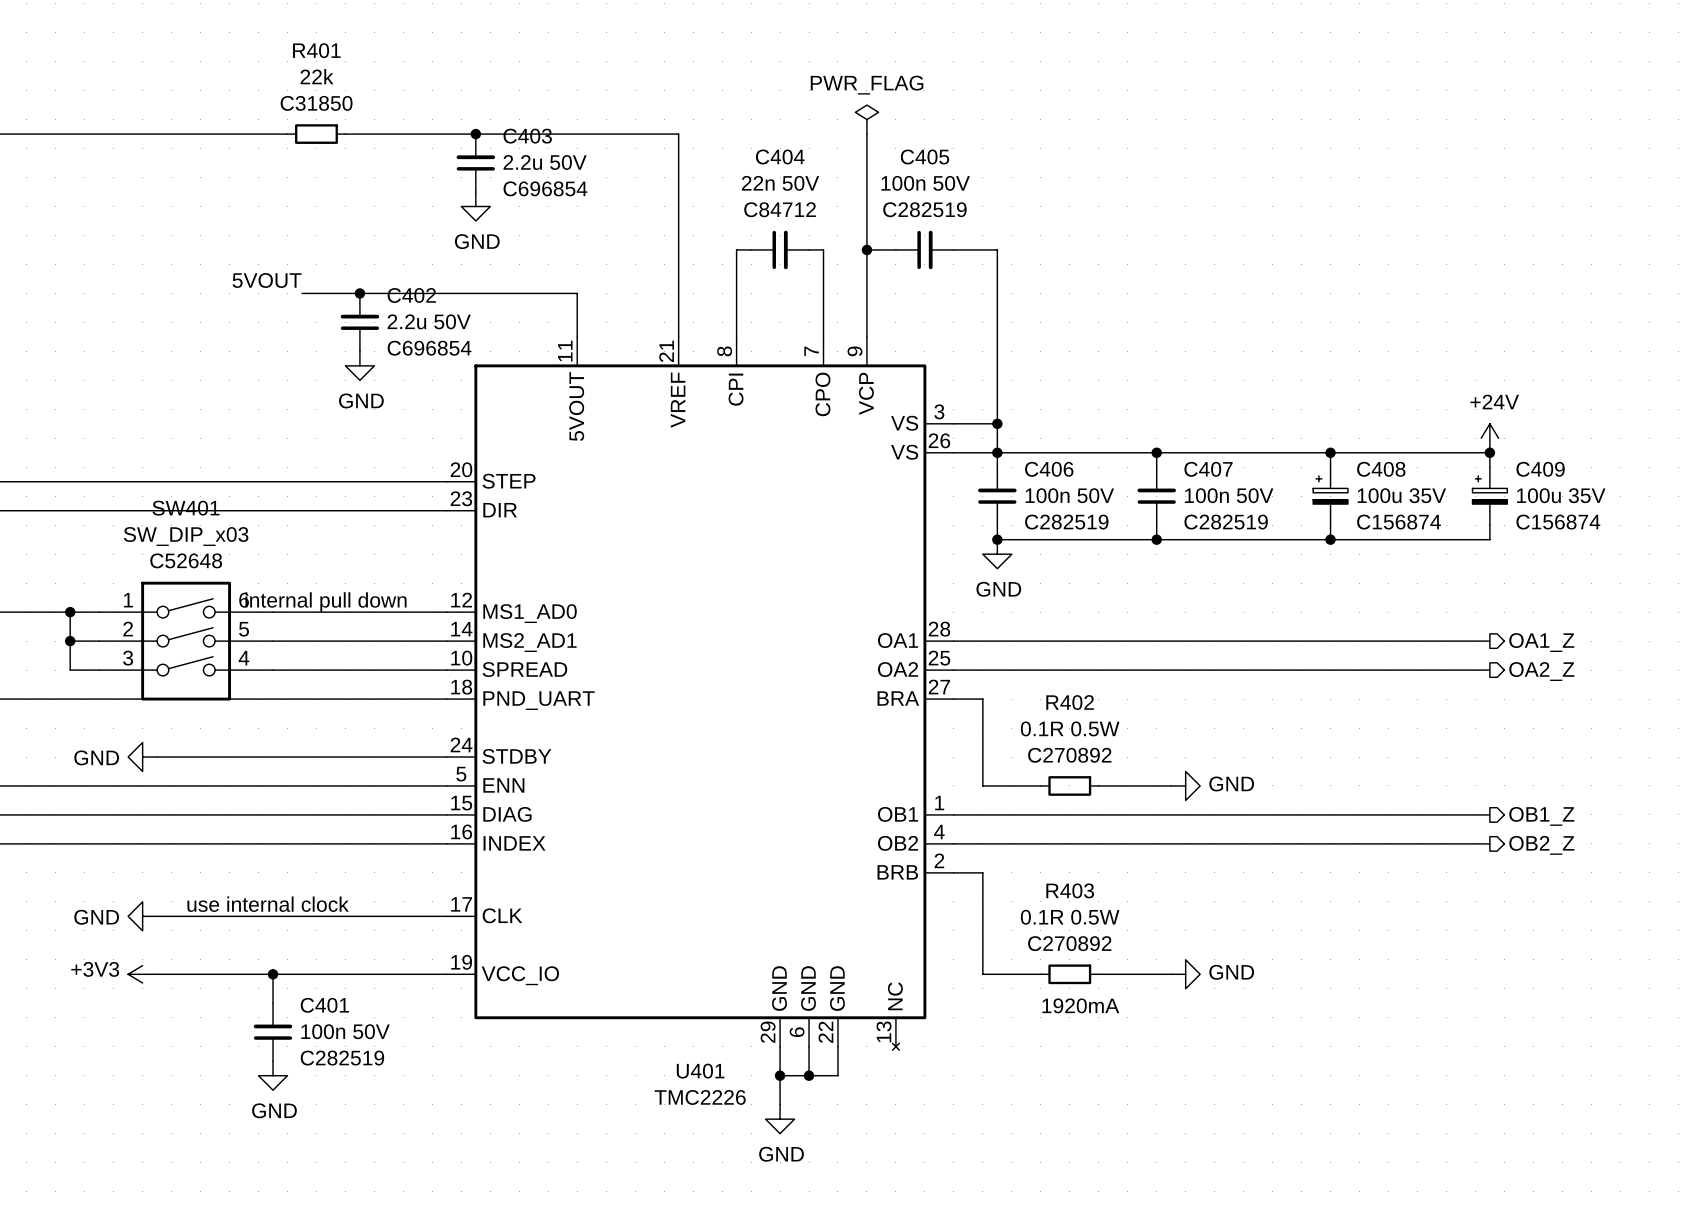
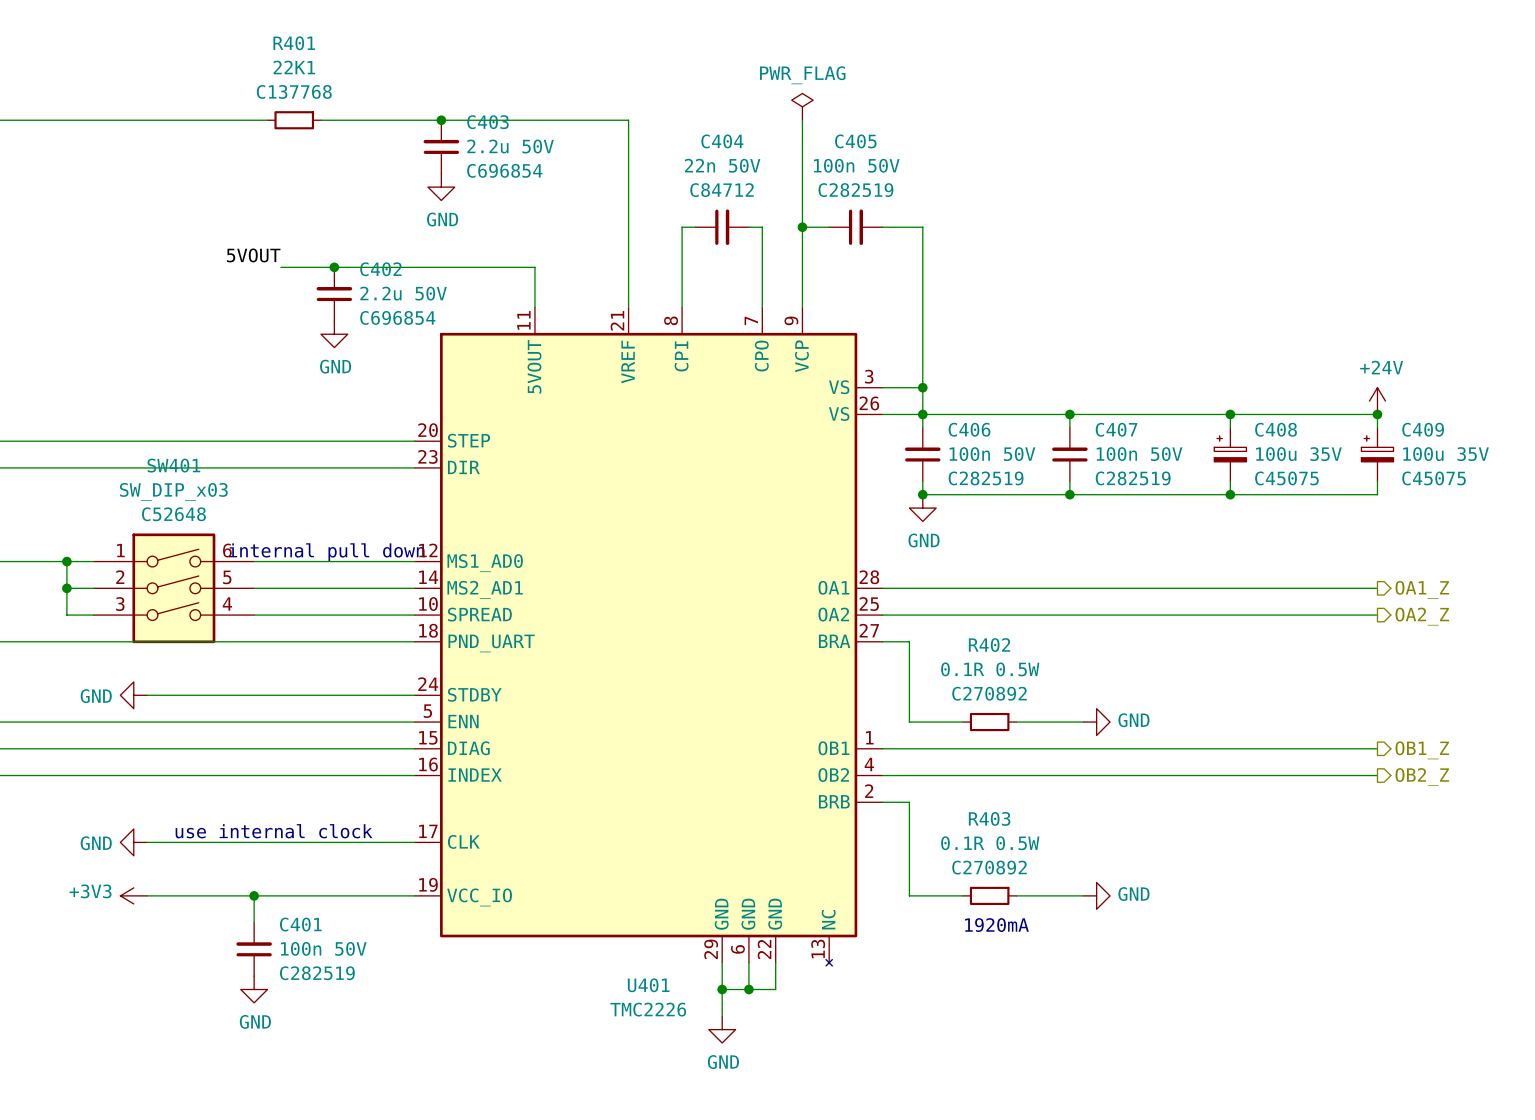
R401 value: 22k (317, 76) -> 22K1 (294, 67)
R401 text: C31850 (316, 103) -> C137768 (294, 91)
C408 text: C156874 (1399, 522) -> C45075 (1286, 478)
C409 text: C156874 (1558, 522) -> C45075 (1434, 478)

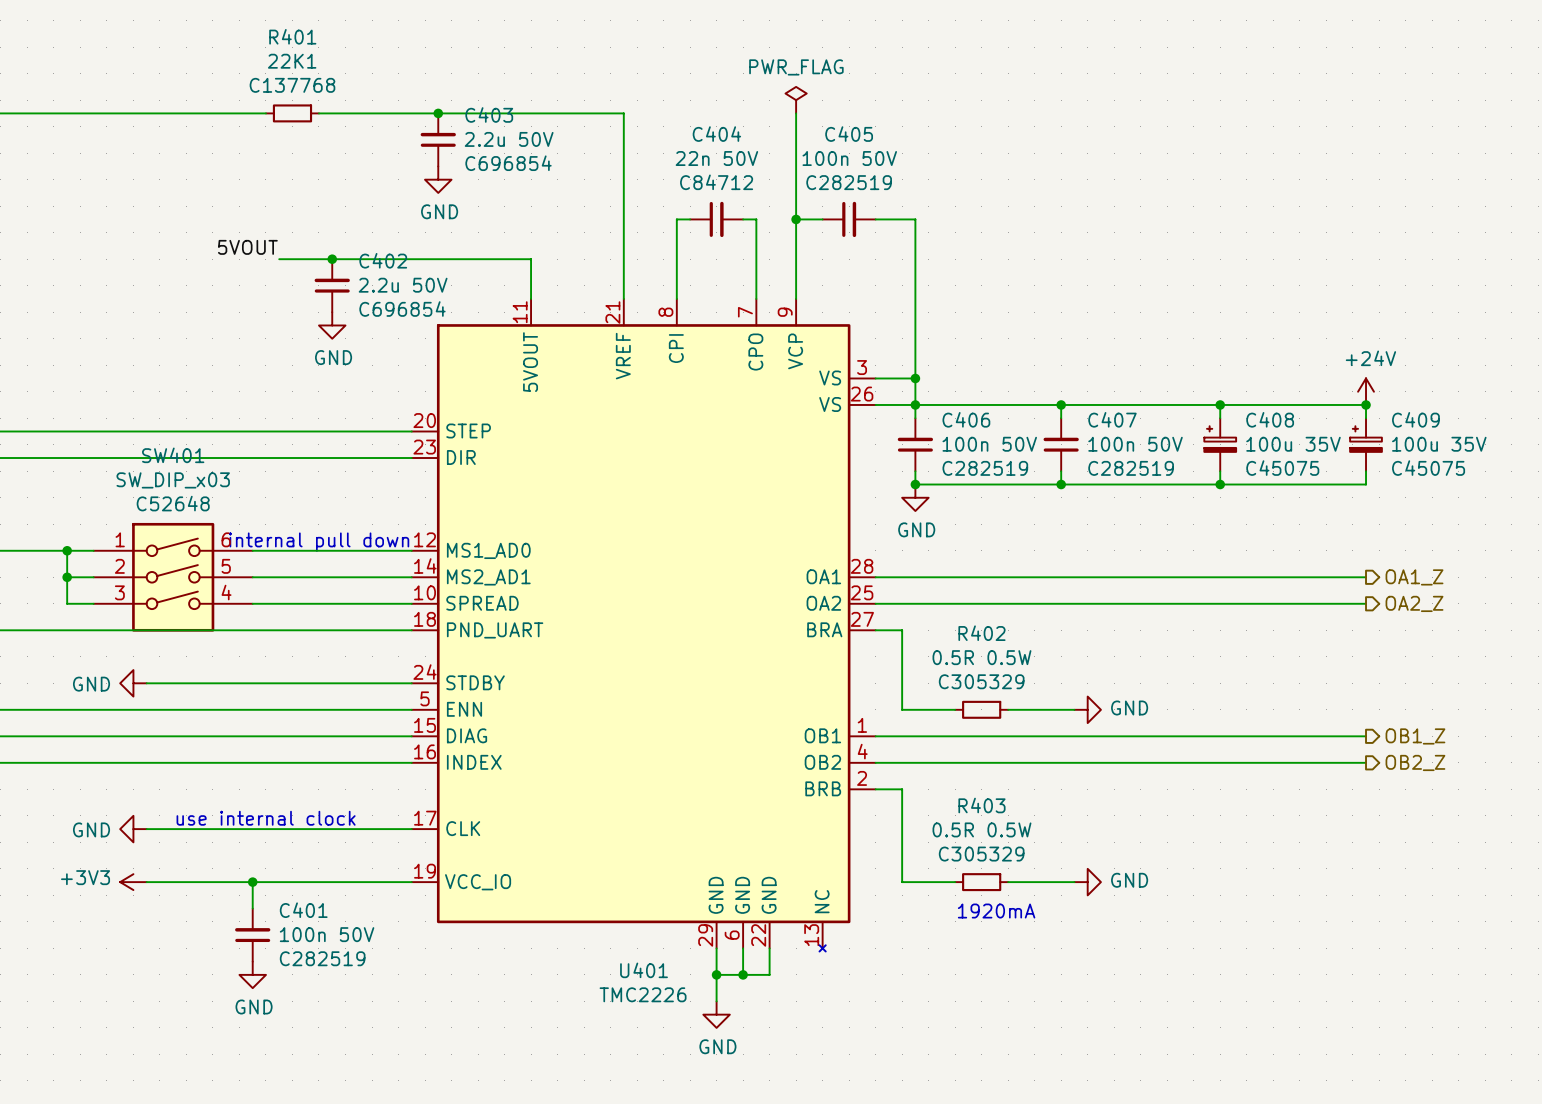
R402 value: 0.1R 0.5W (990, 669) -> 0.5R 0.5W (981, 657)
R402 text: C270892 (989, 693) -> C305329 (981, 681)
R403 value: 0.1R 0.5W (990, 843) -> 0.5R 0.5W (981, 829)
R403 text: C270892 (989, 867) -> C305329 (981, 854)

